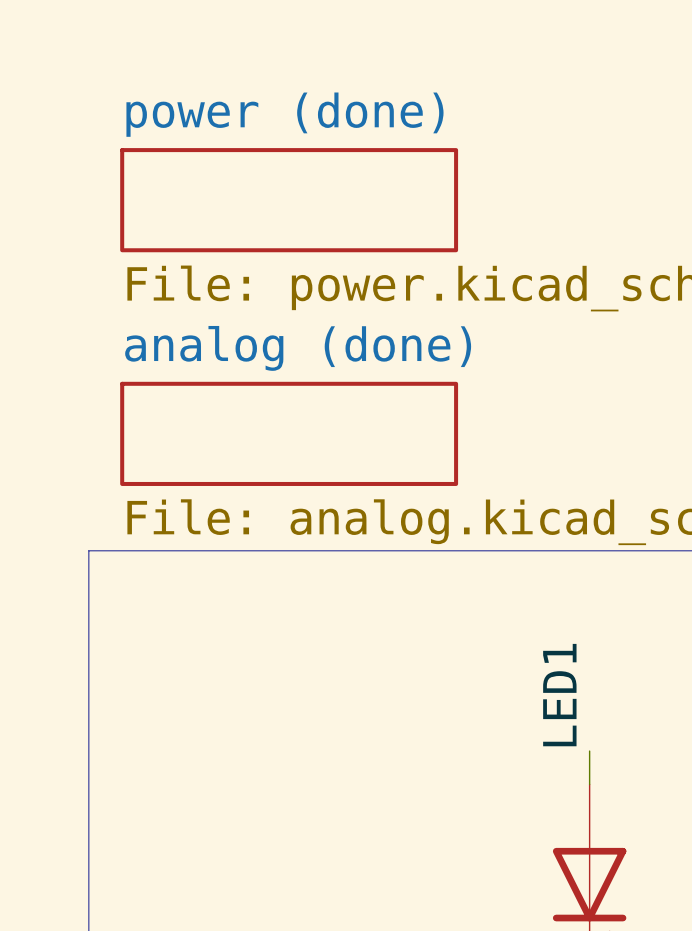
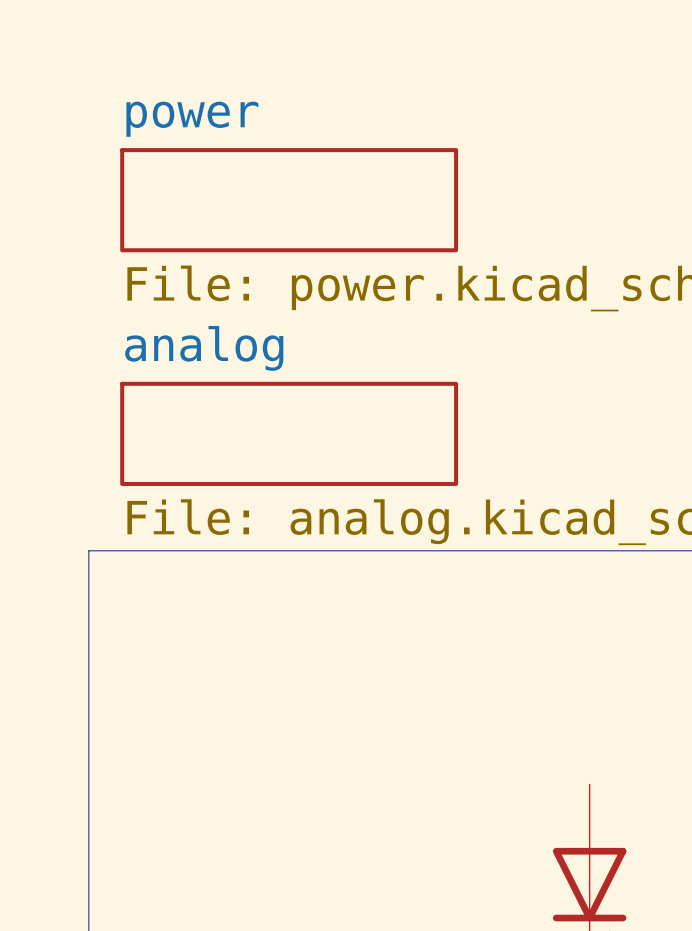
sheet power (done) name: power (done) (284, 114) -> power (192, 119)
sheet analog (done) name: analog (done) (298, 348) -> analog (204, 348)
label: LED1 (559, 695) -> none
wire: (589, 751) (589, 784) -> none

